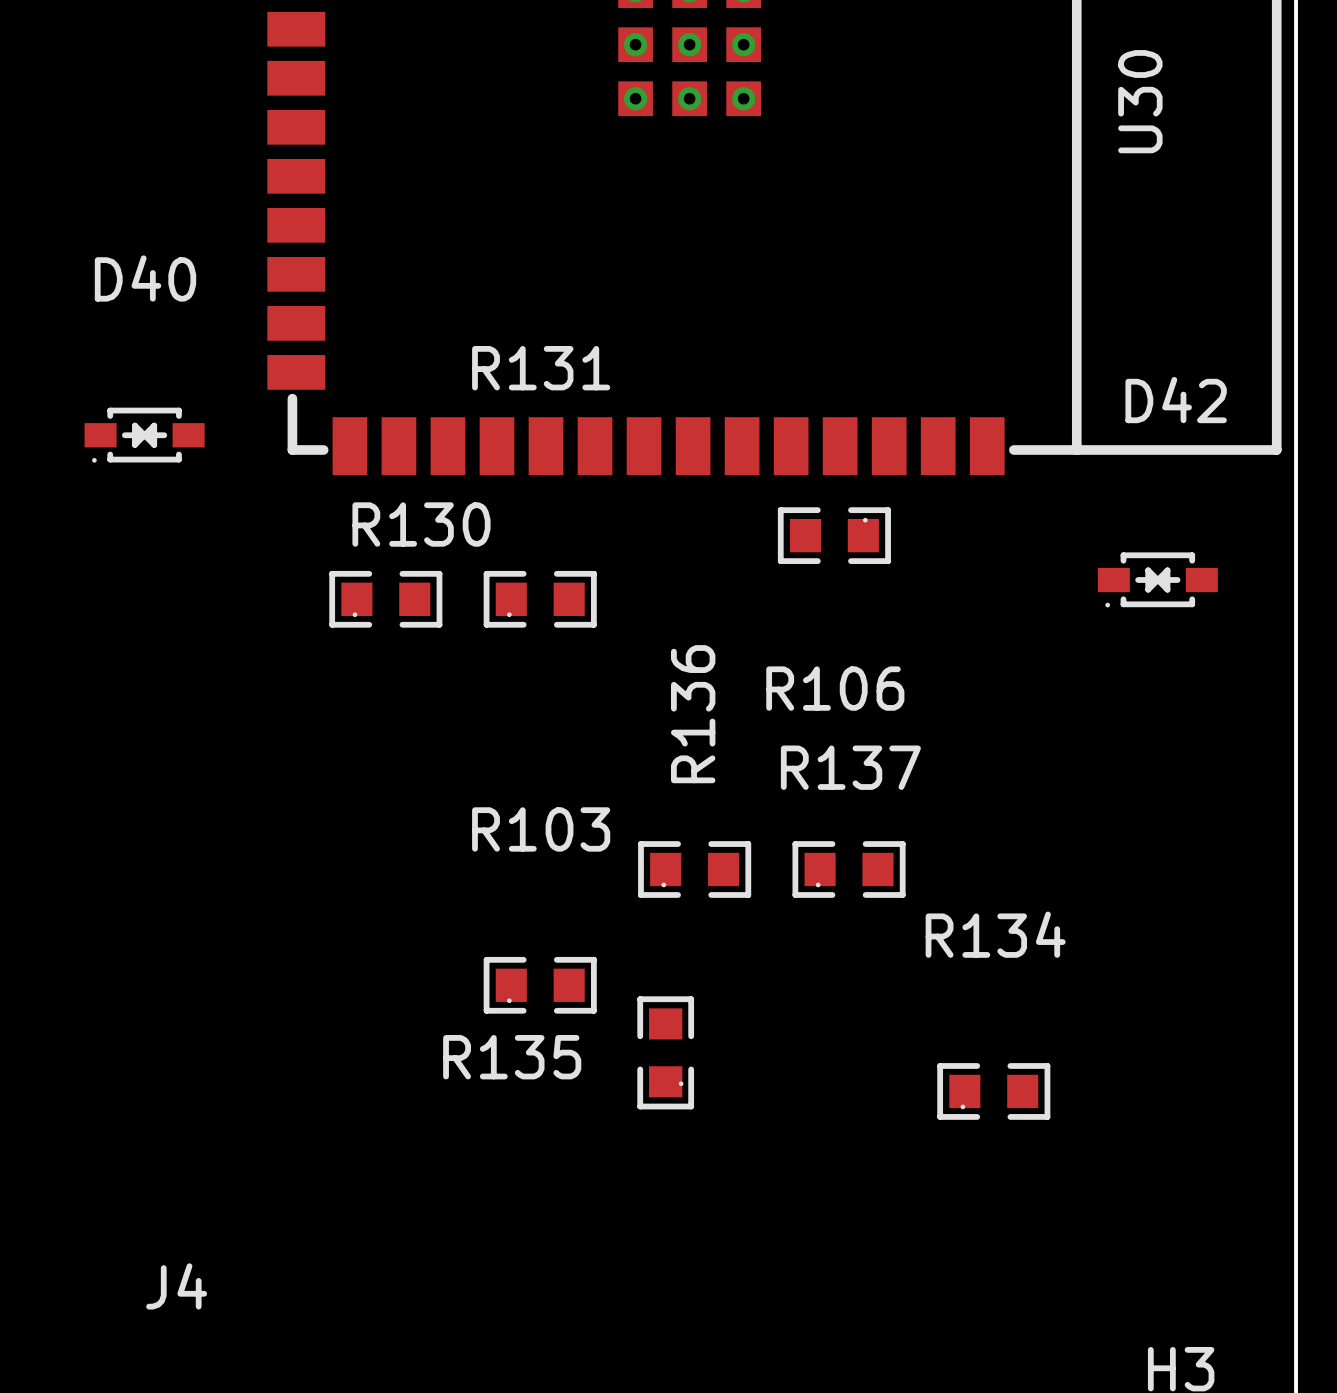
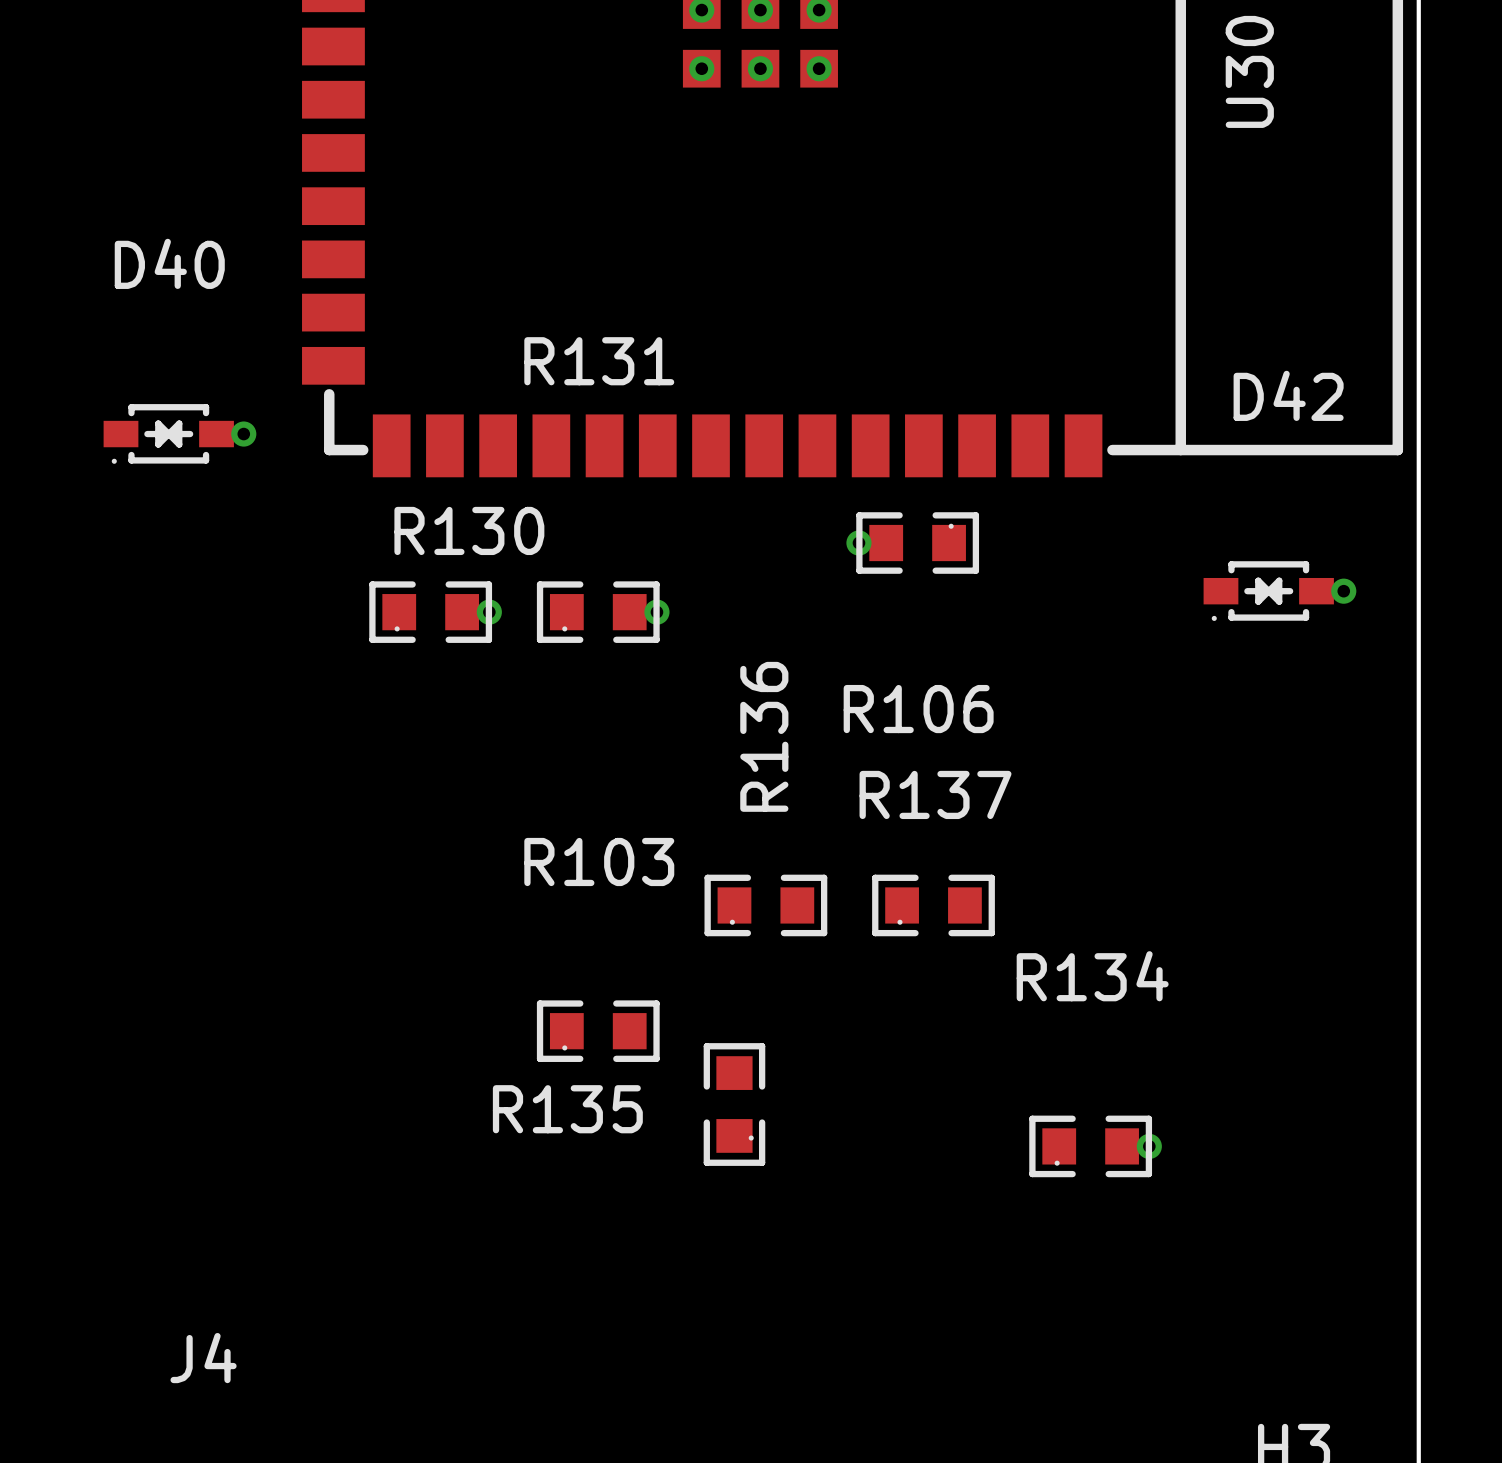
via: none -> (243, 434)
via: none -> (858, 542)
via: none -> (1343, 591)
via: none -> (489, 612)
via: none -> (656, 612)
via: none -> (1149, 1146)

